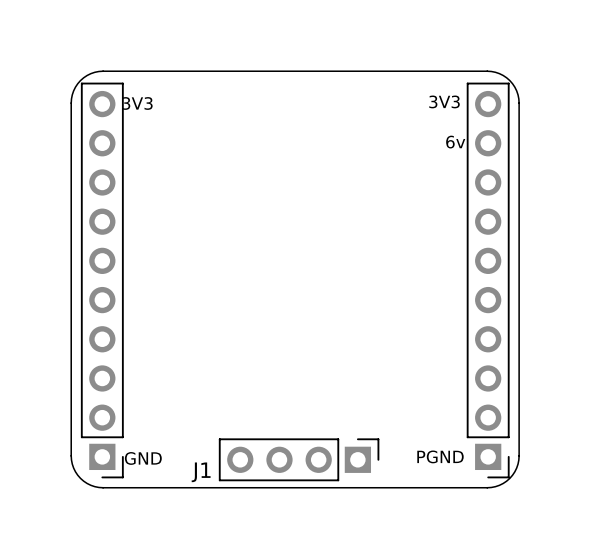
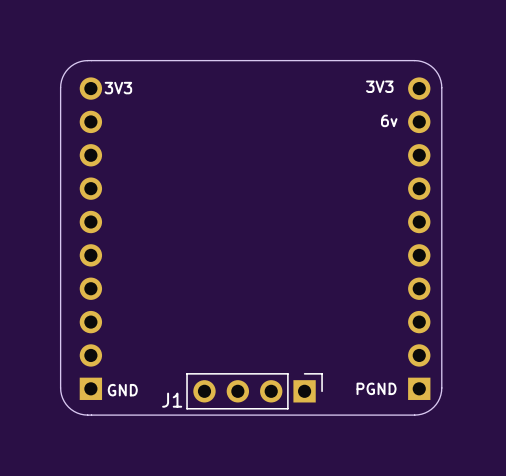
part side: top (102, 280) -> bottom (90, 238)
part side: top (488, 280) -> bottom (419, 238)

